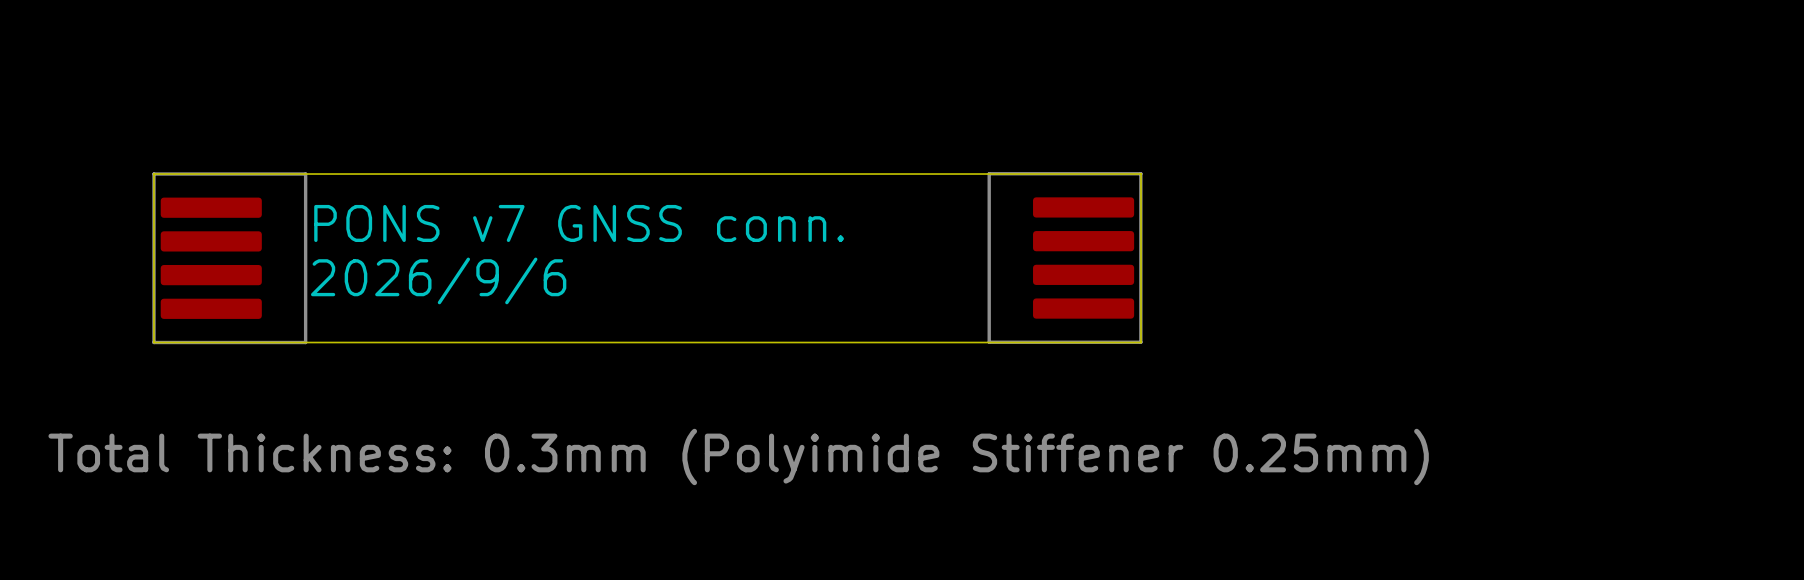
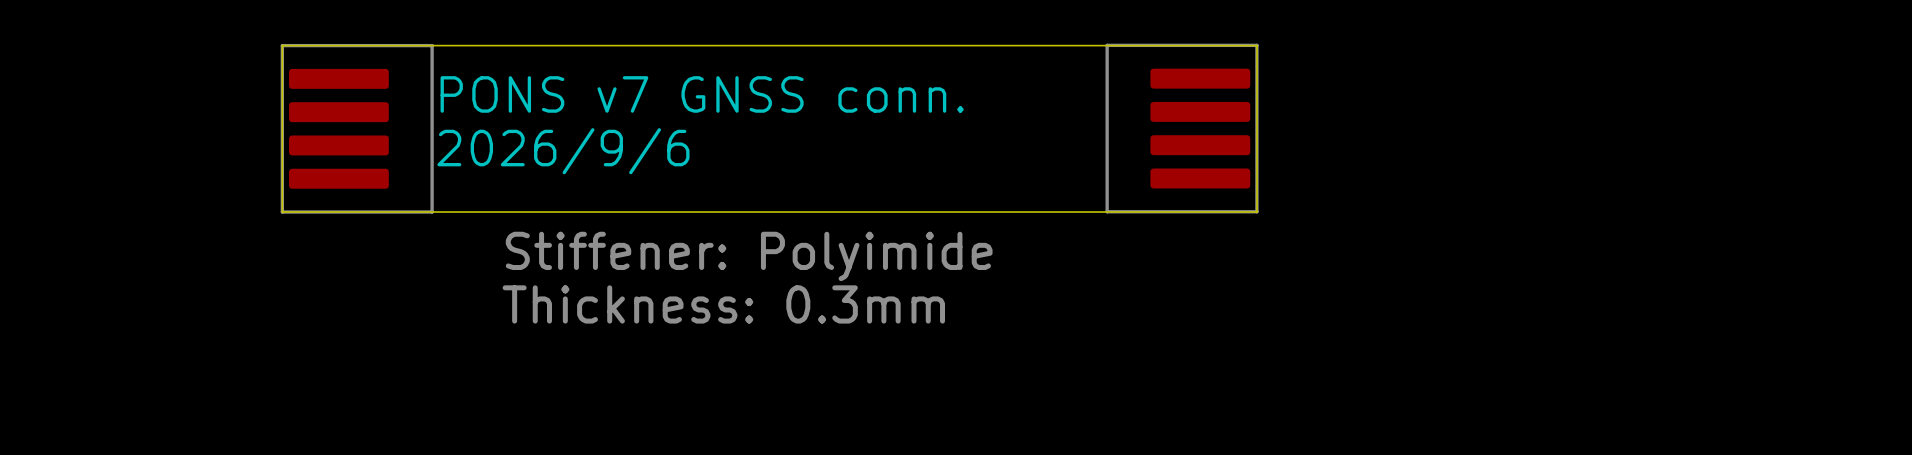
text: none -> Stiffener: Polyimide (749, 256)
text: none -> Thickness: 0.3mm (723, 304)
text: Total Thickness: 0.3mm (Polyimide Stiffener 0.25mm) (738, 456) -> none

